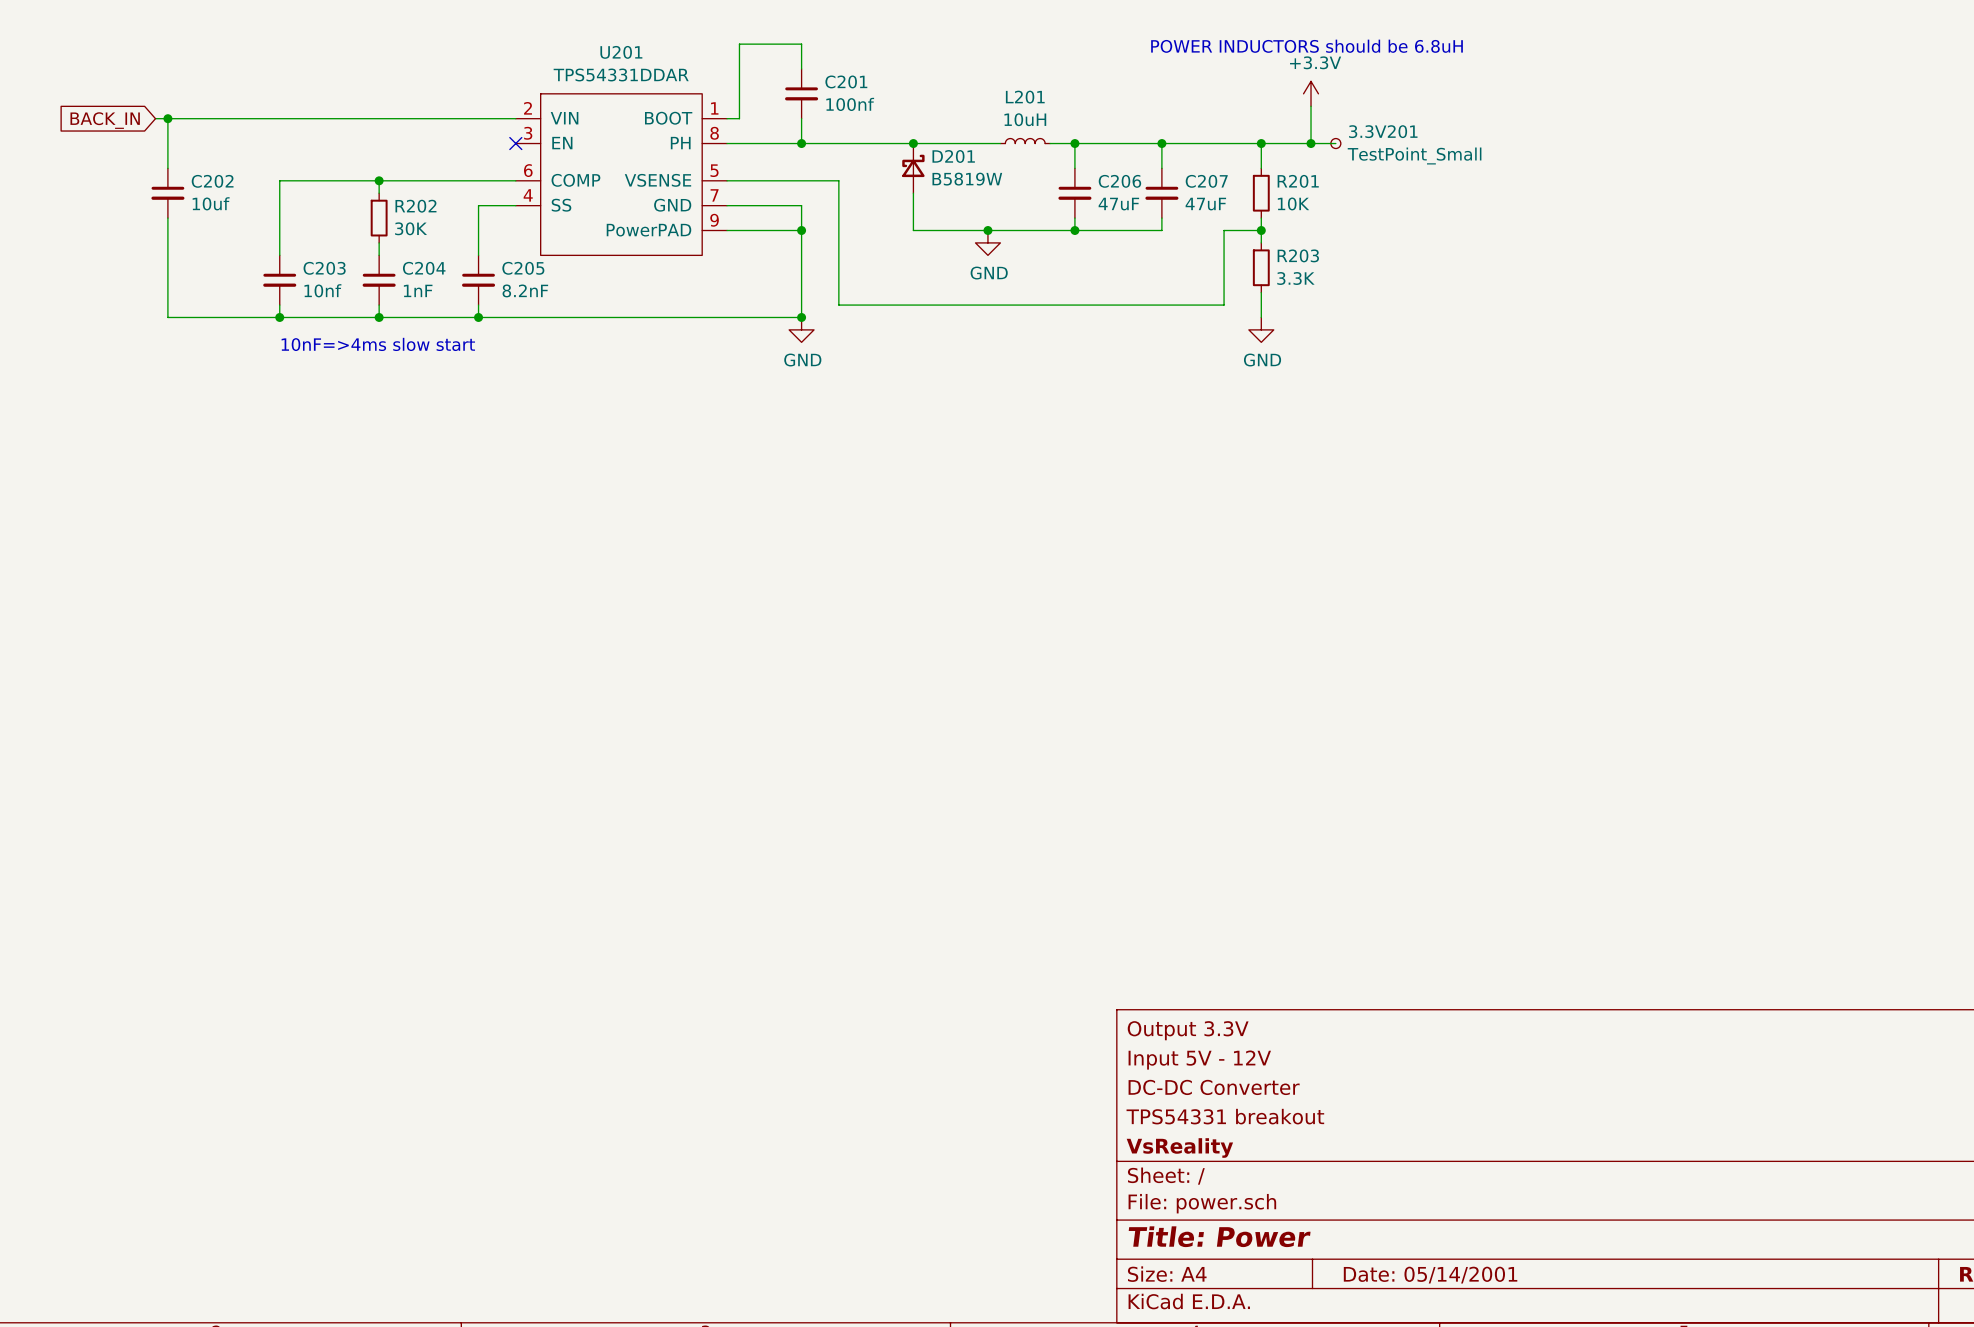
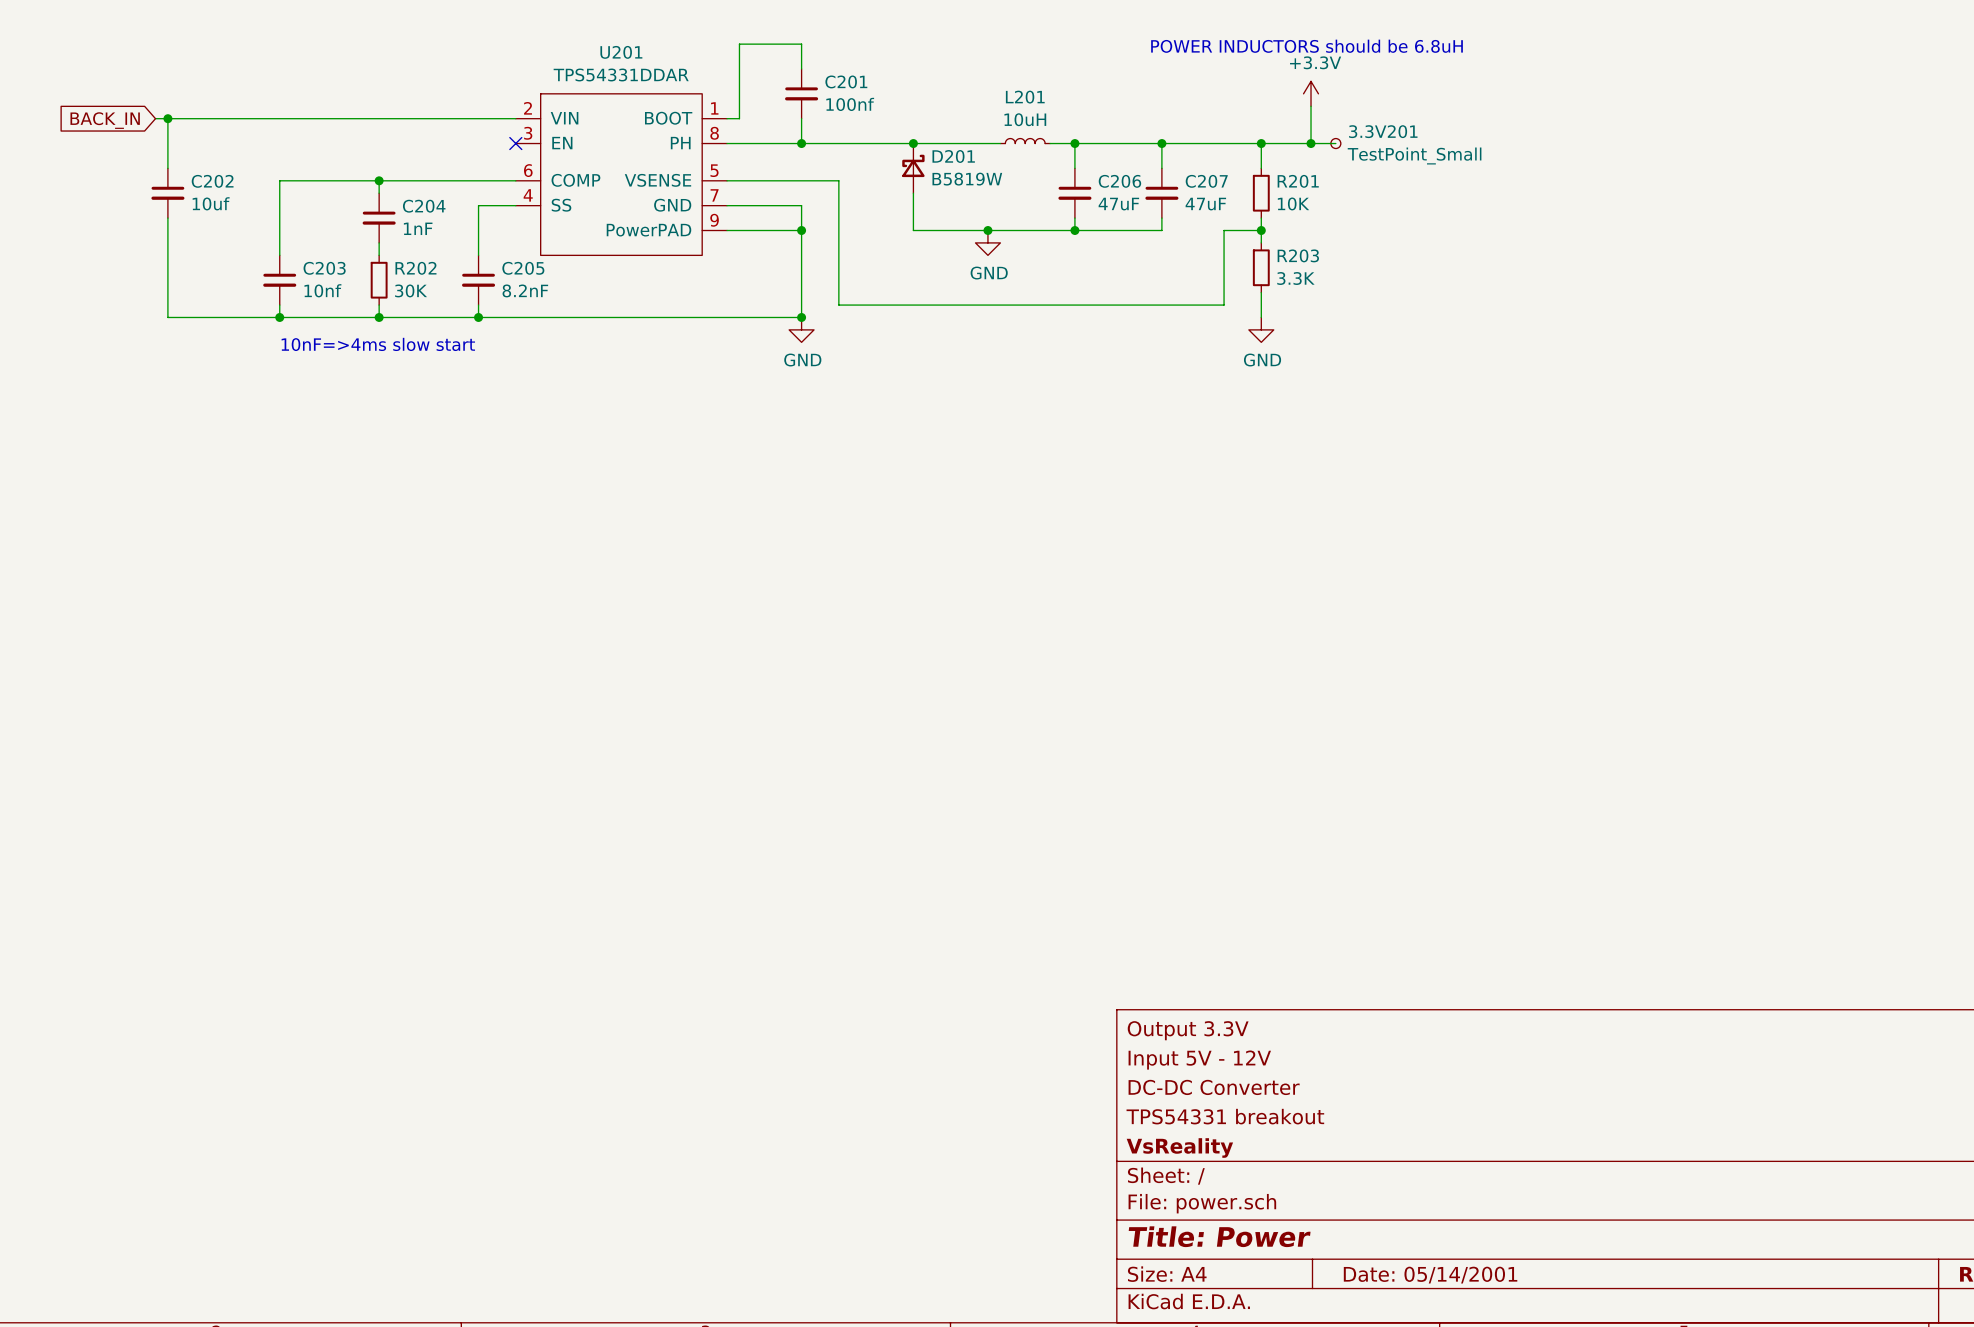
R202 position: (379, 218) -> (379, 280)
C204 position: (379, 280) -> (379, 218)

